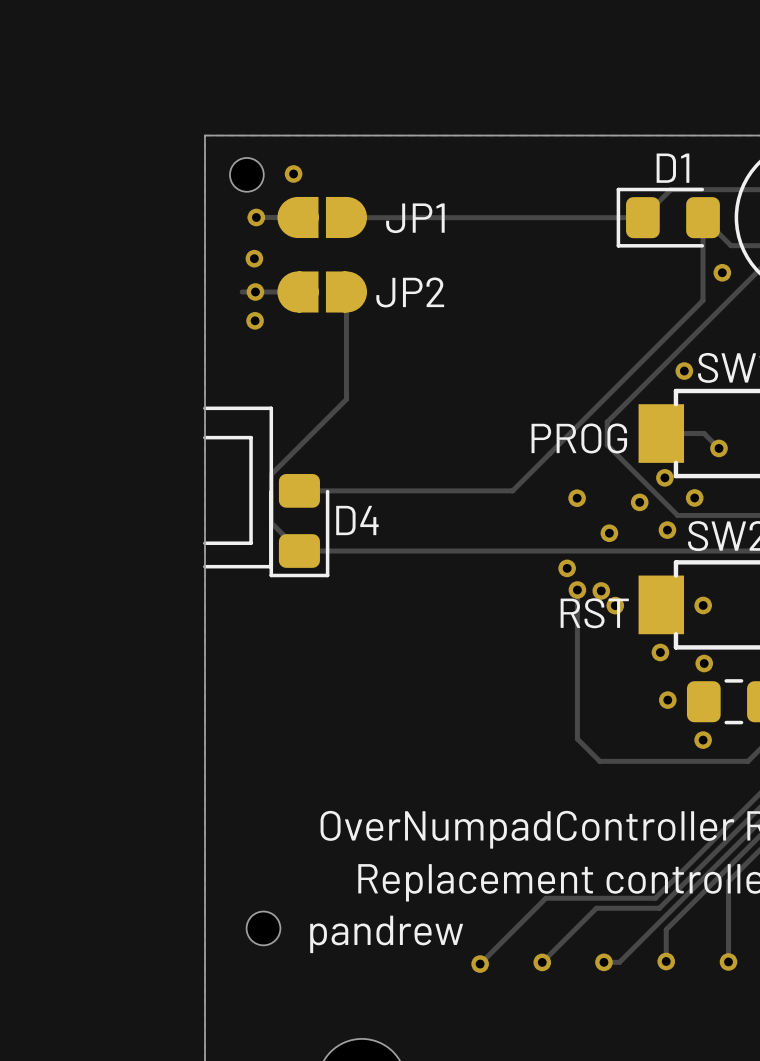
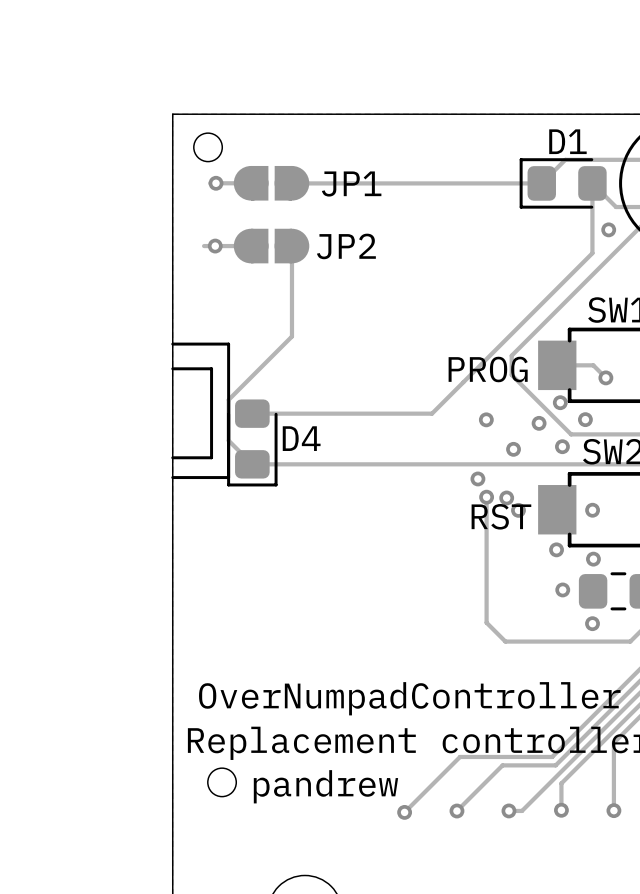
via: (293, 173) -> none
via: (254, 258) -> none
via: (255, 320) -> none
via: (684, 371) -> none

